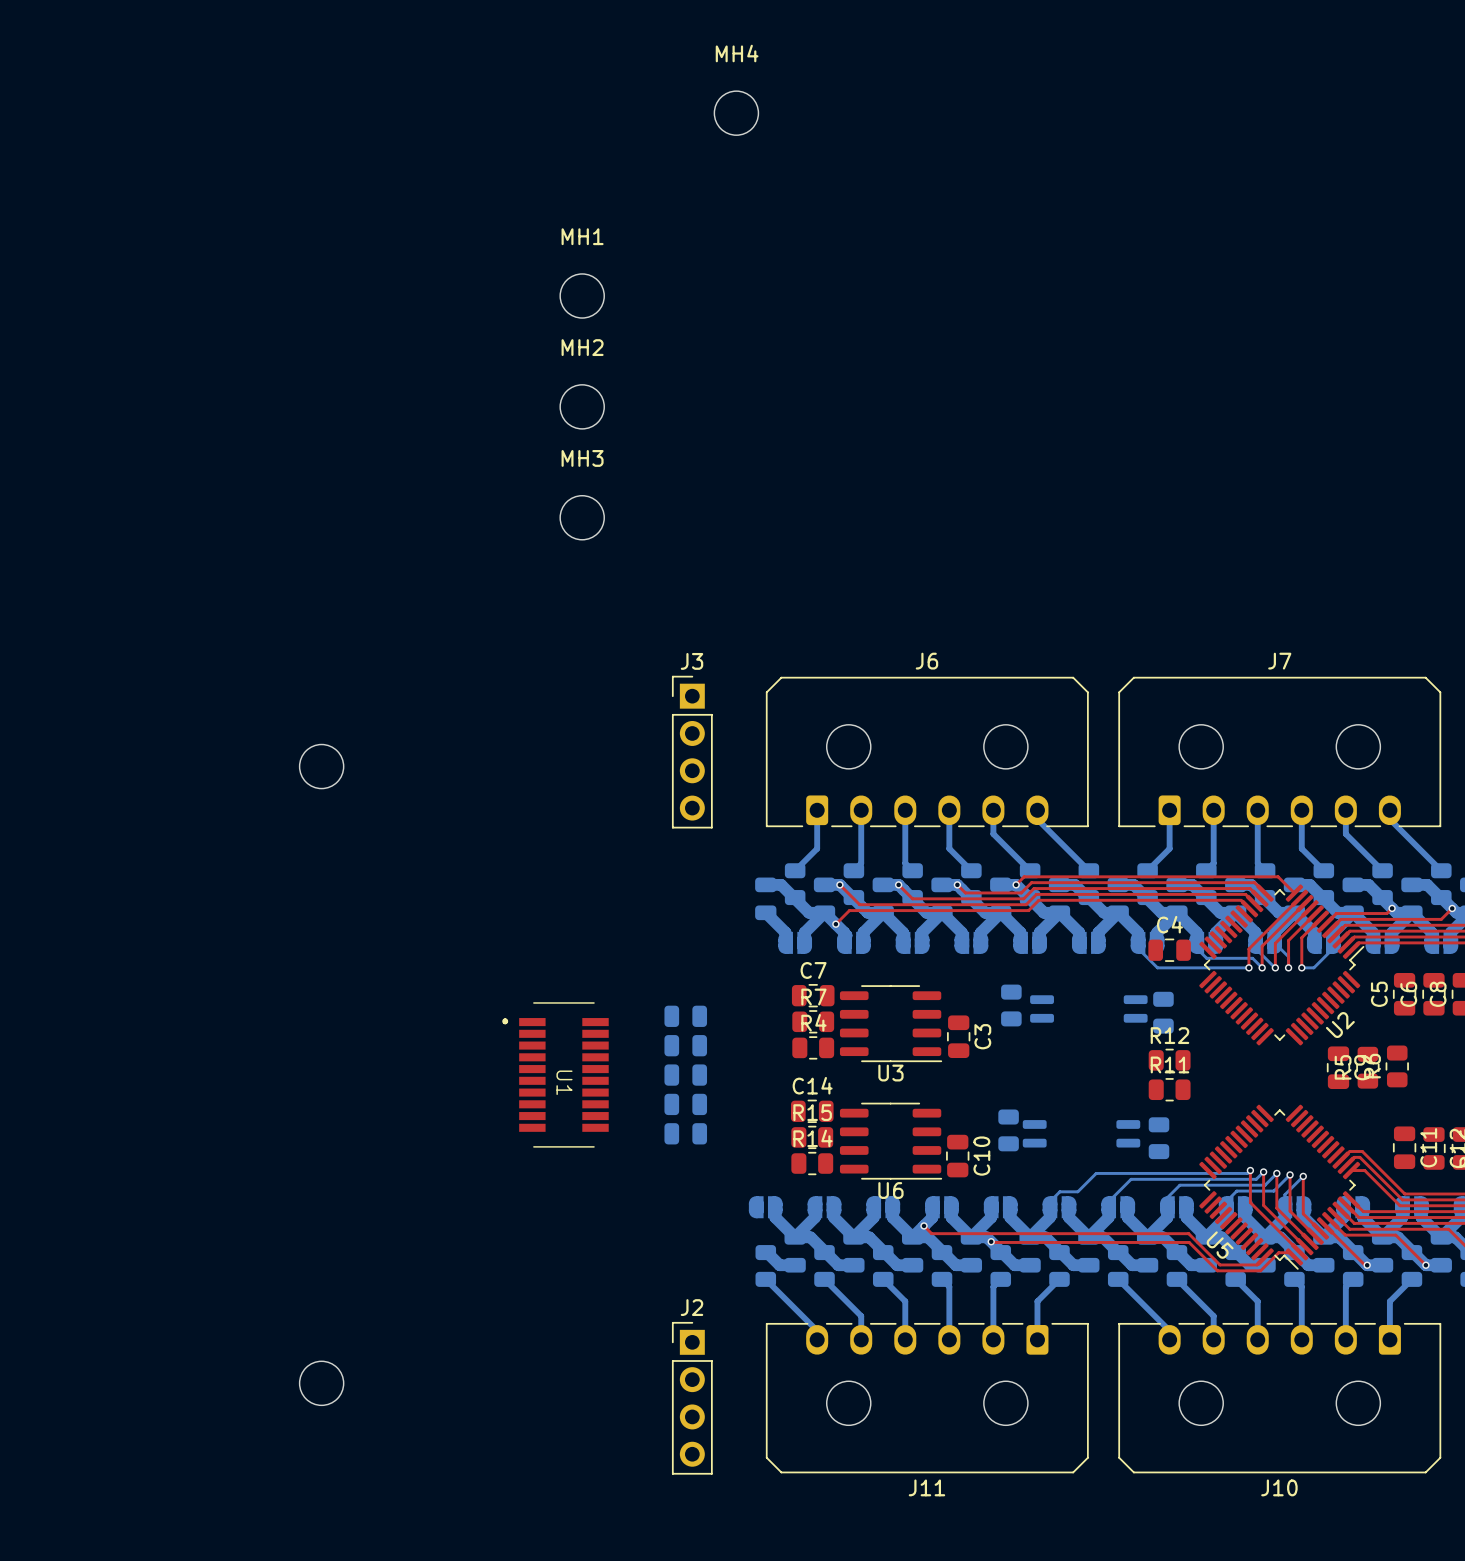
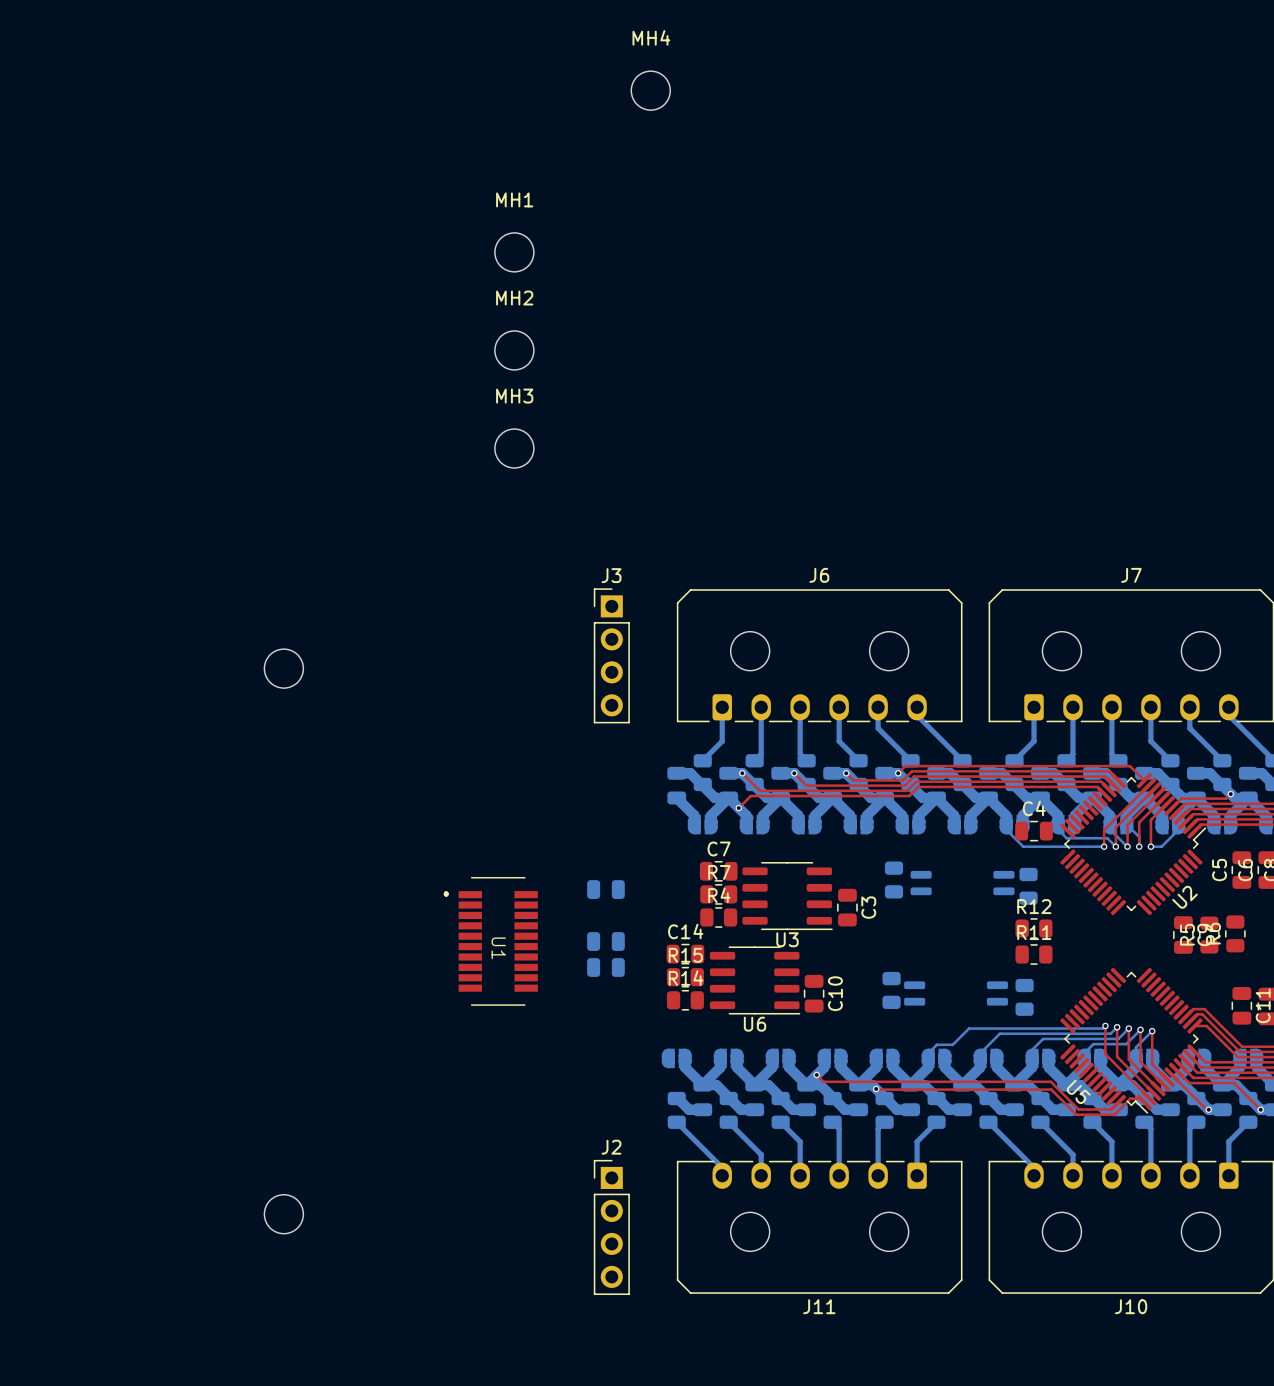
part: (685, 1045) -> none
C14 position: (812, 1111) -> (685, 954)
part: (685, 1133) -> none
R15 position: (812, 1137) -> (685, 977)
U6 position: (891, 1141) -> (755, 980)
C10 position: (957, 1156) -> (814, 993)
R14 position: (812, 1163) -> (685, 1000)

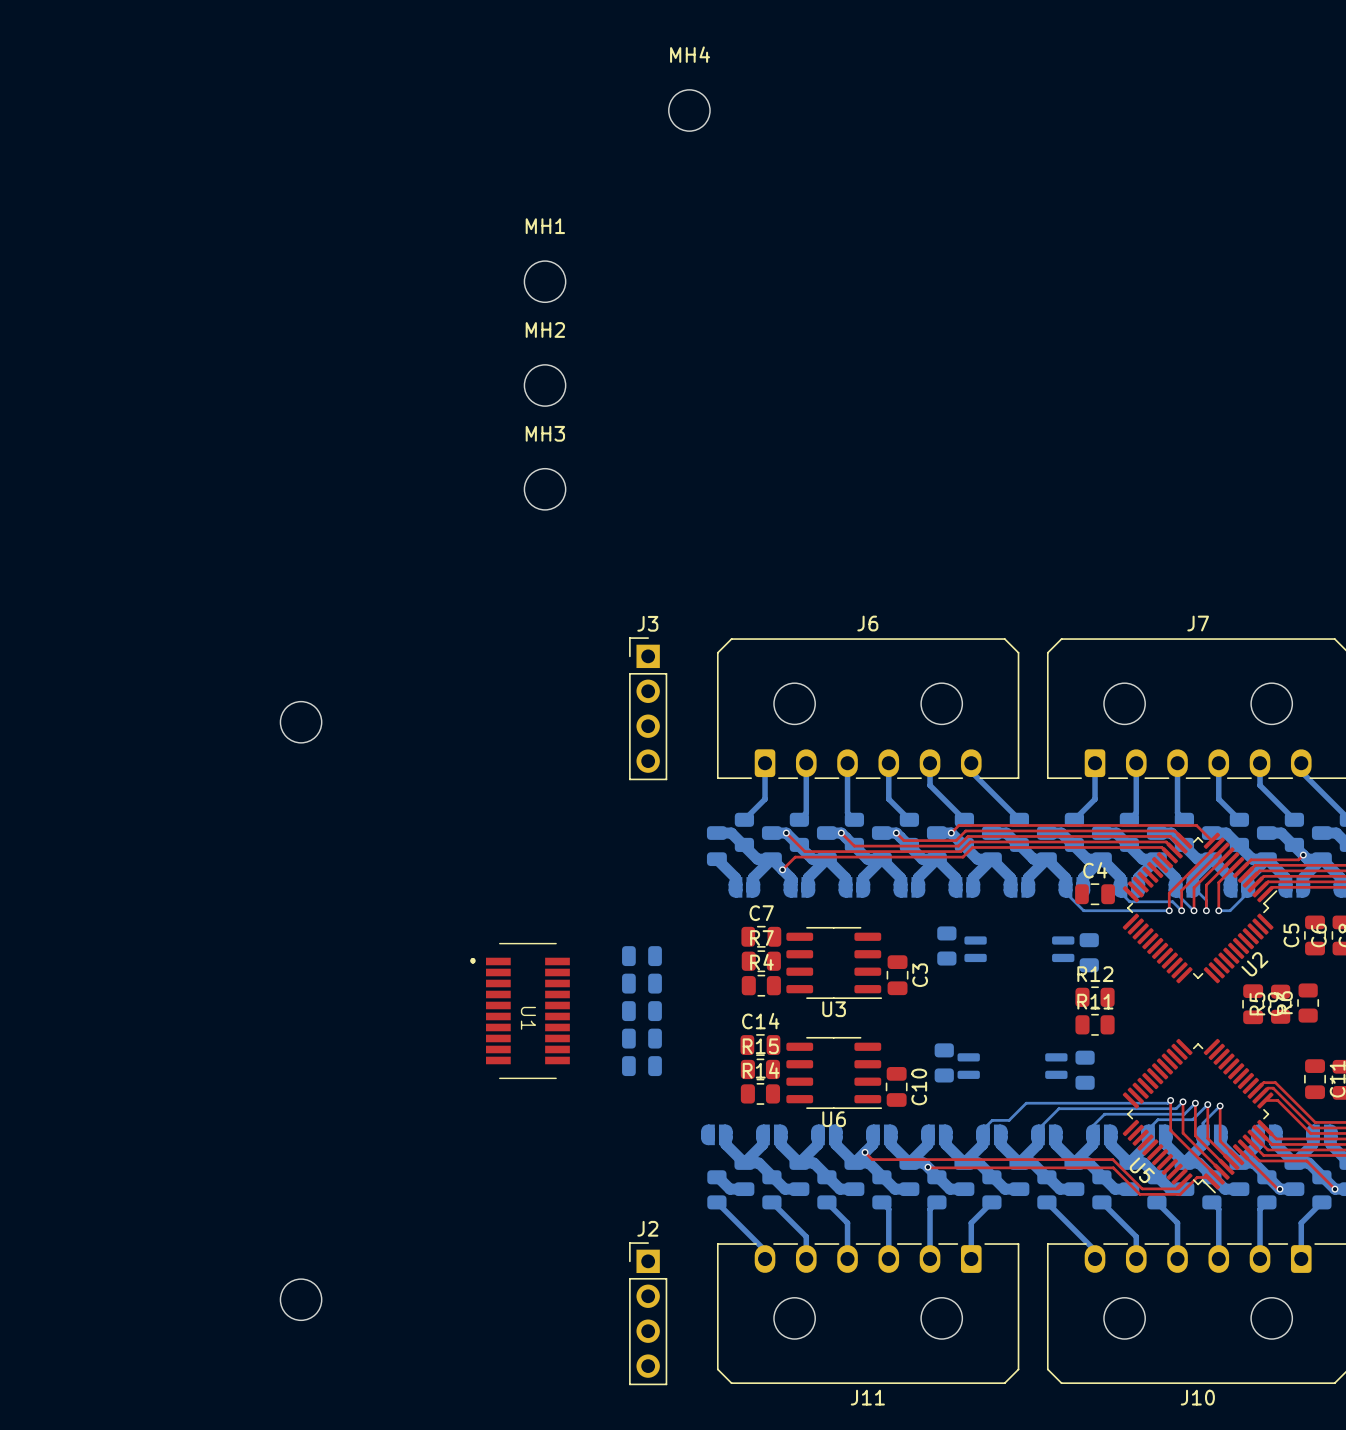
part: none -> (641, 983)
C14 position: (685, 954) -> (760, 1045)
R15 position: (685, 977) -> (760, 1069)
U6 position: (755, 980) -> (834, 1072)
part: none -> (641, 1066)
C10 position: (814, 993) -> (896, 1086)
R14 position: (685, 1000) -> (760, 1093)

